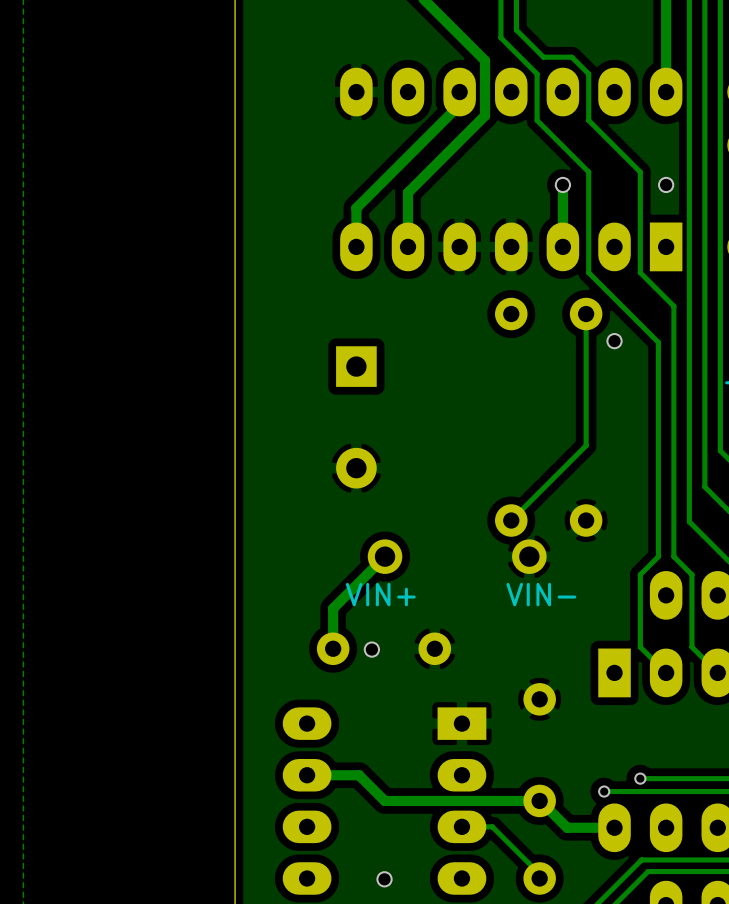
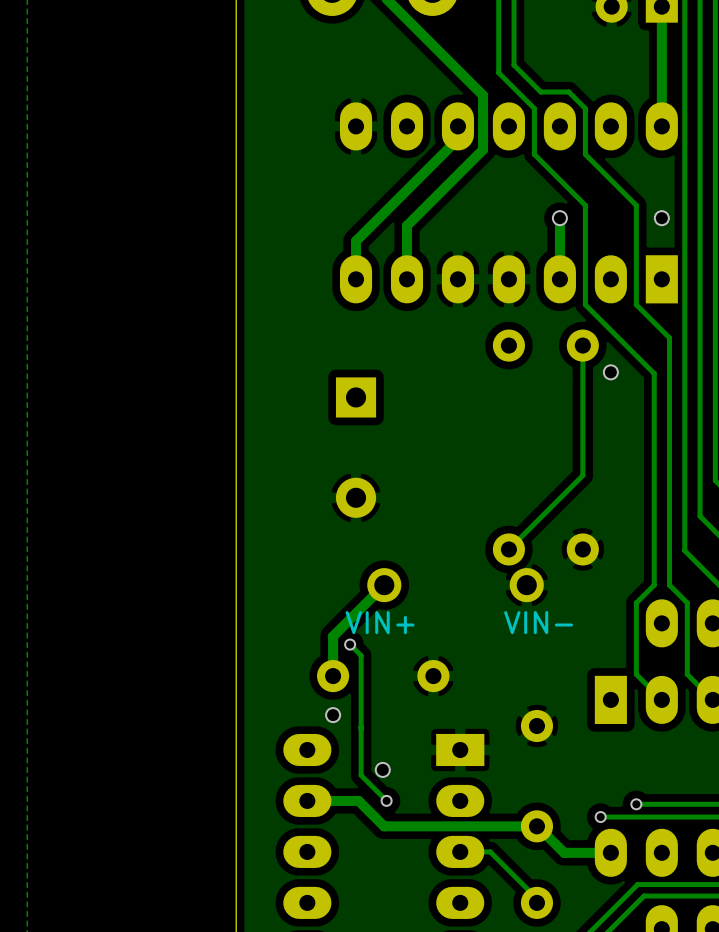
track: none -> (350, 644) (361, 655) (361, 775) (386, 800)
via: none -> (350, 644)
via: (371, 649) -> none
via: none -> (333, 715)
via: none -> (382, 769)
via: none -> (386, 800)
via: (384, 879) -> none

